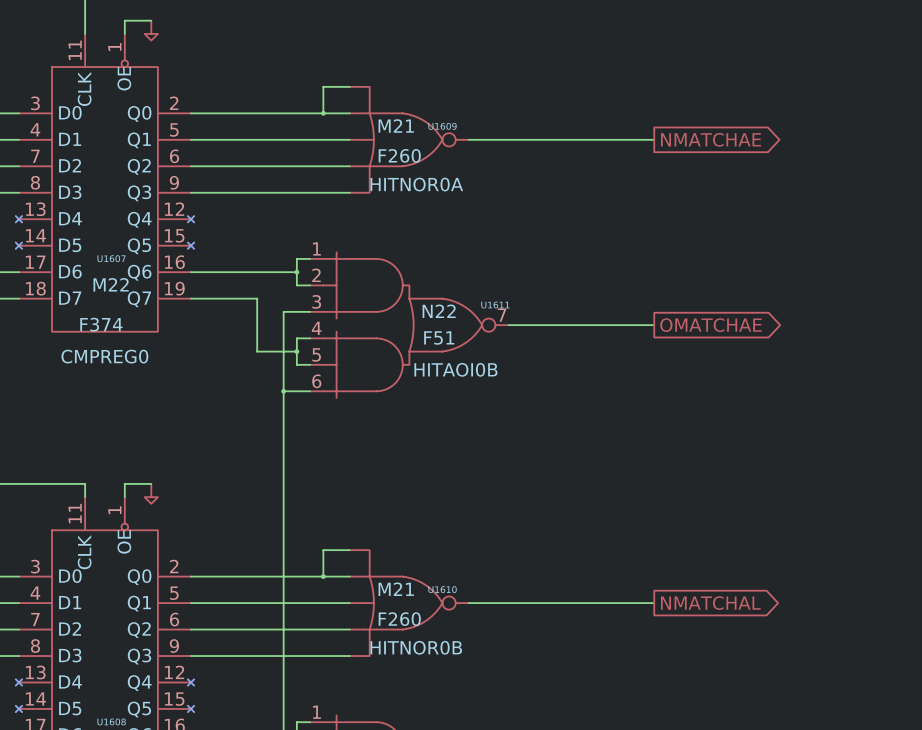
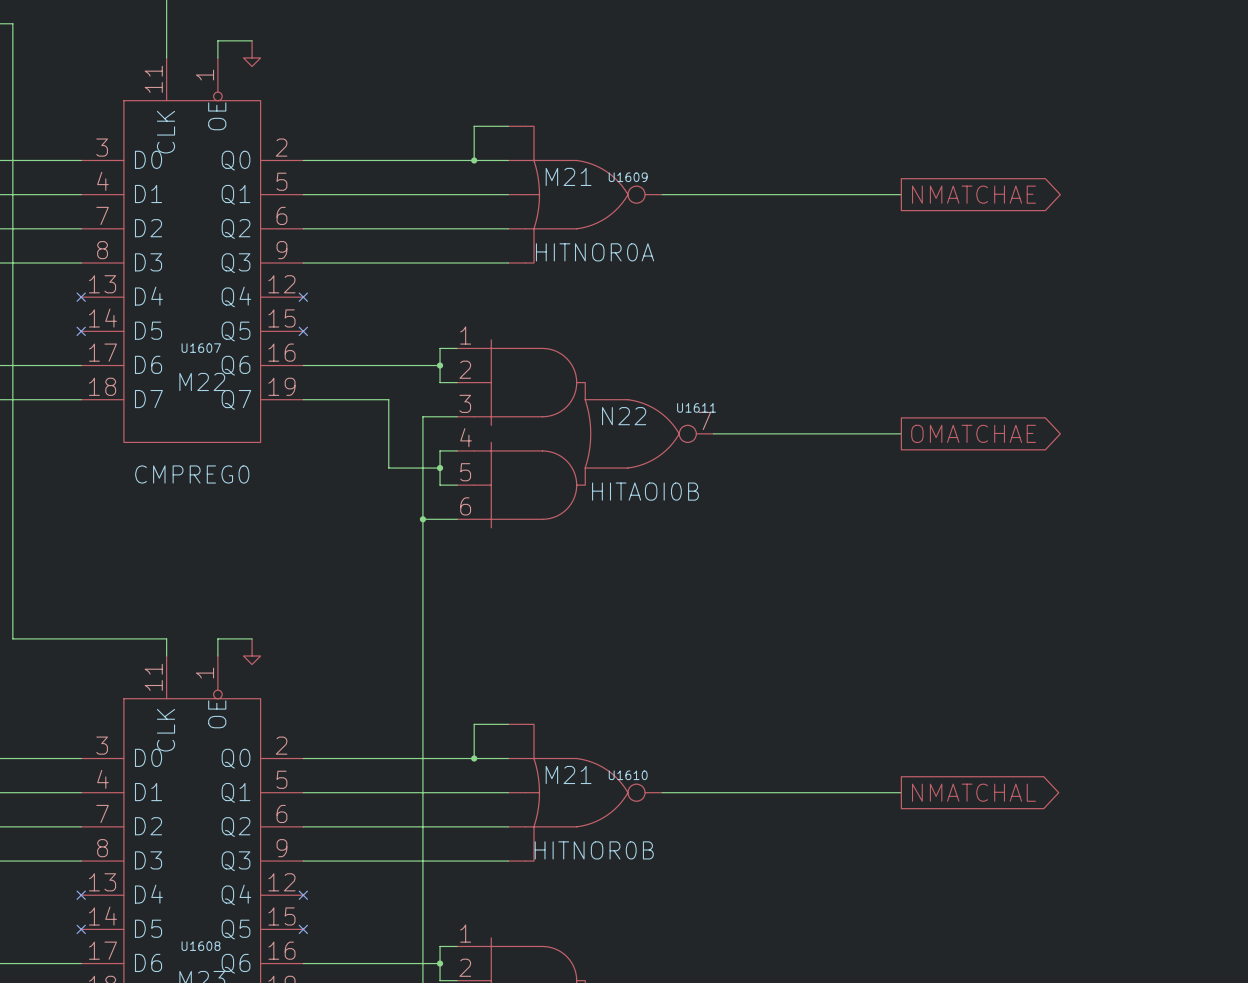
U1609 value: F260 (399, 155) -> none
U1607 value: F374 (101, 324) -> none
U1611 value: F51 (439, 337) -> none
U1610 value: F260 (399, 619) -> none

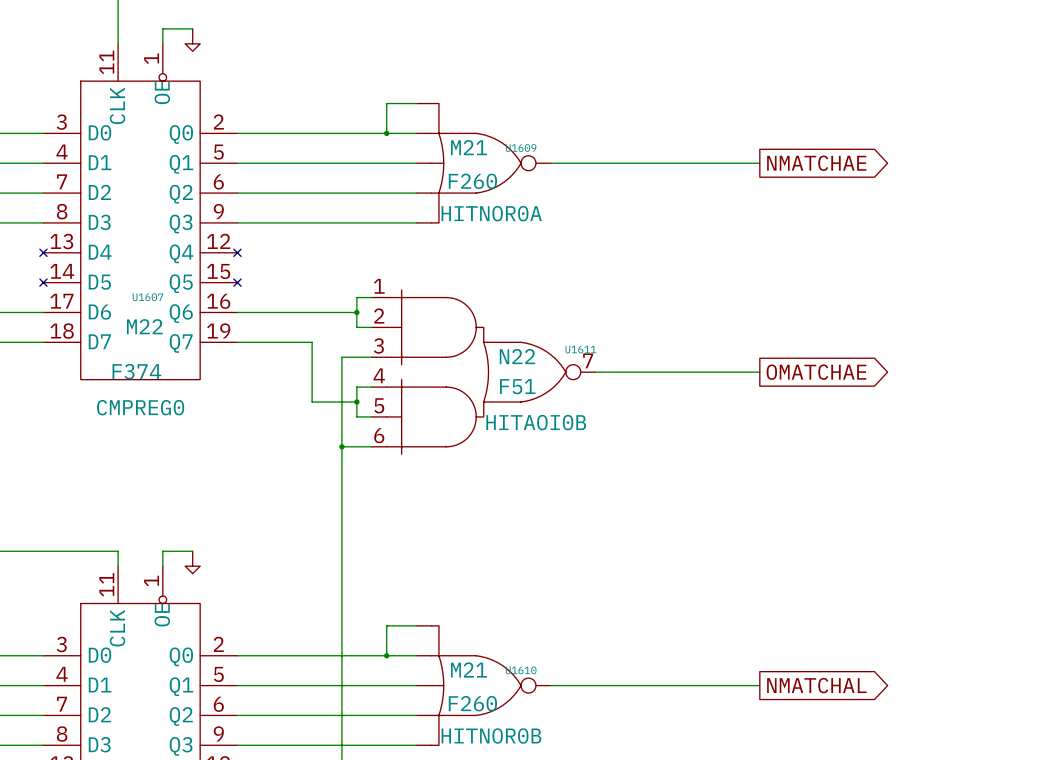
U1609 value: none -> F260 (472, 181)
U1607 value: none -> F374 (136, 371)
U1611 value: none -> F51 (517, 386)
U1610 value: none -> F260 (472, 703)

